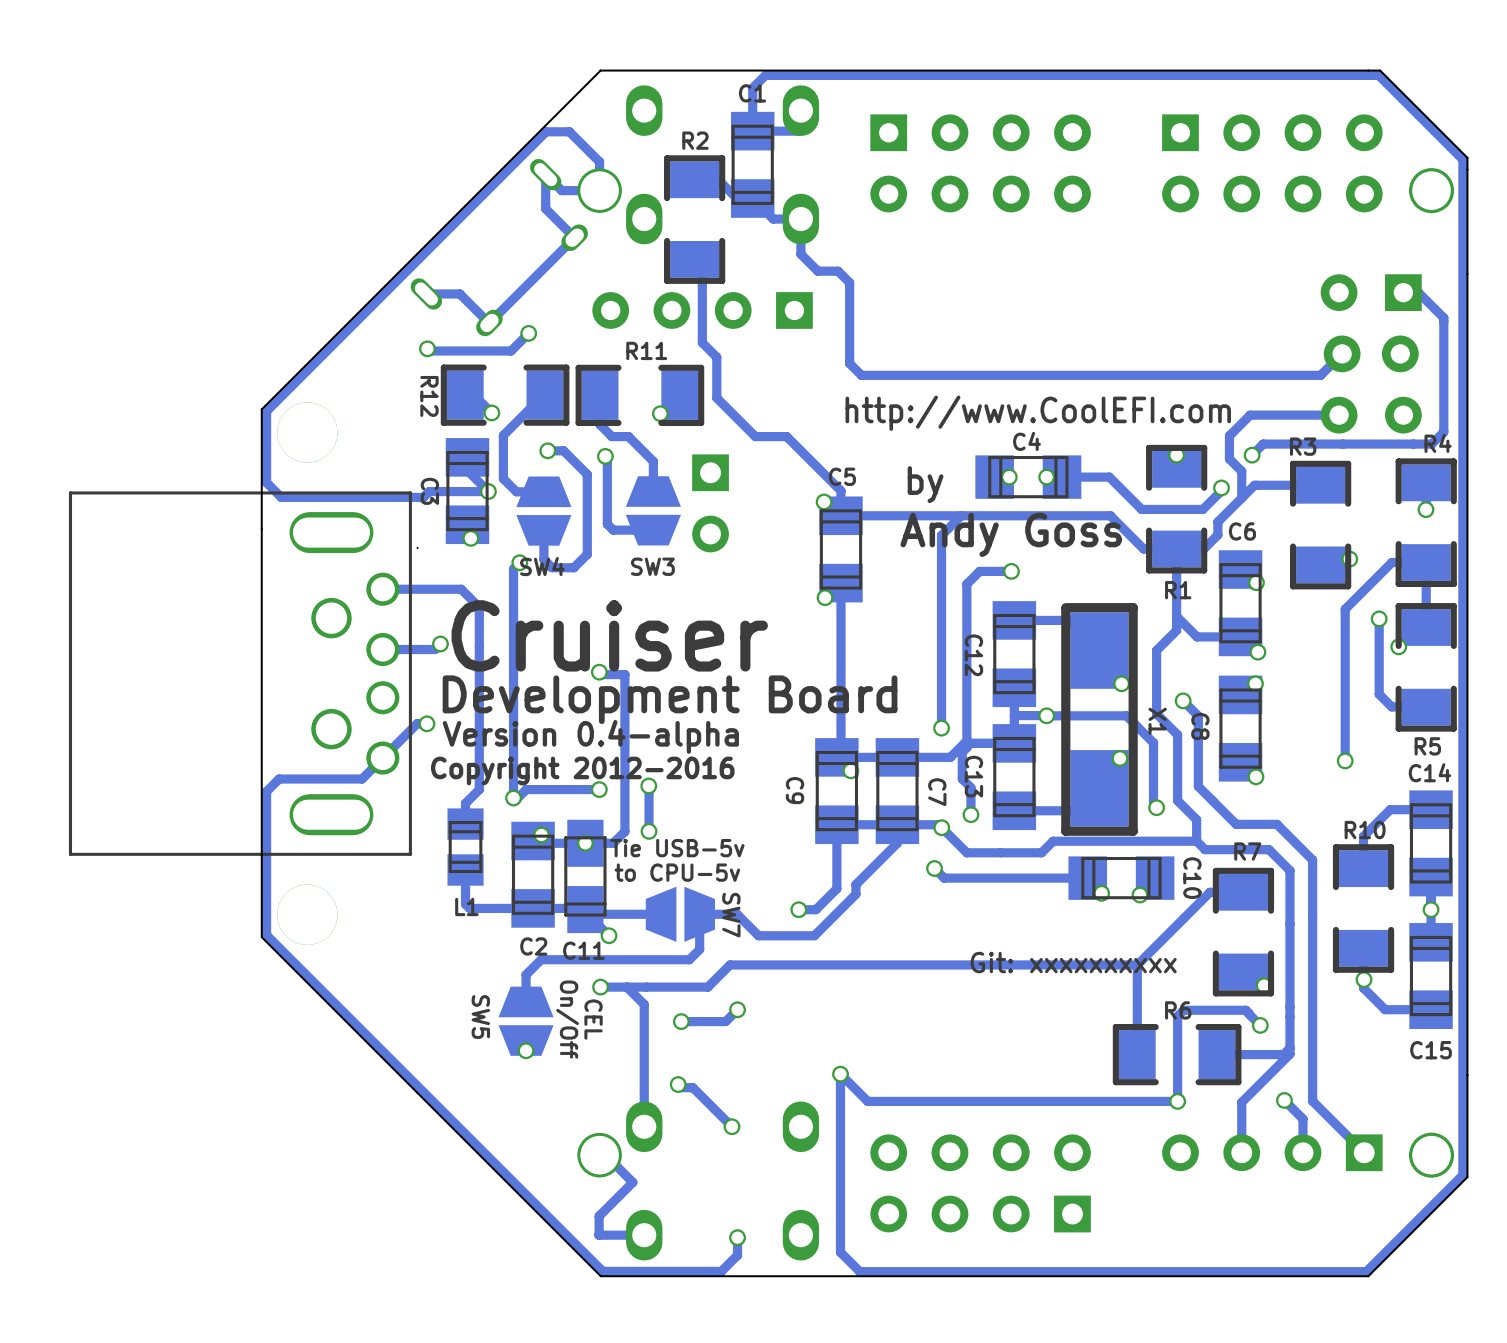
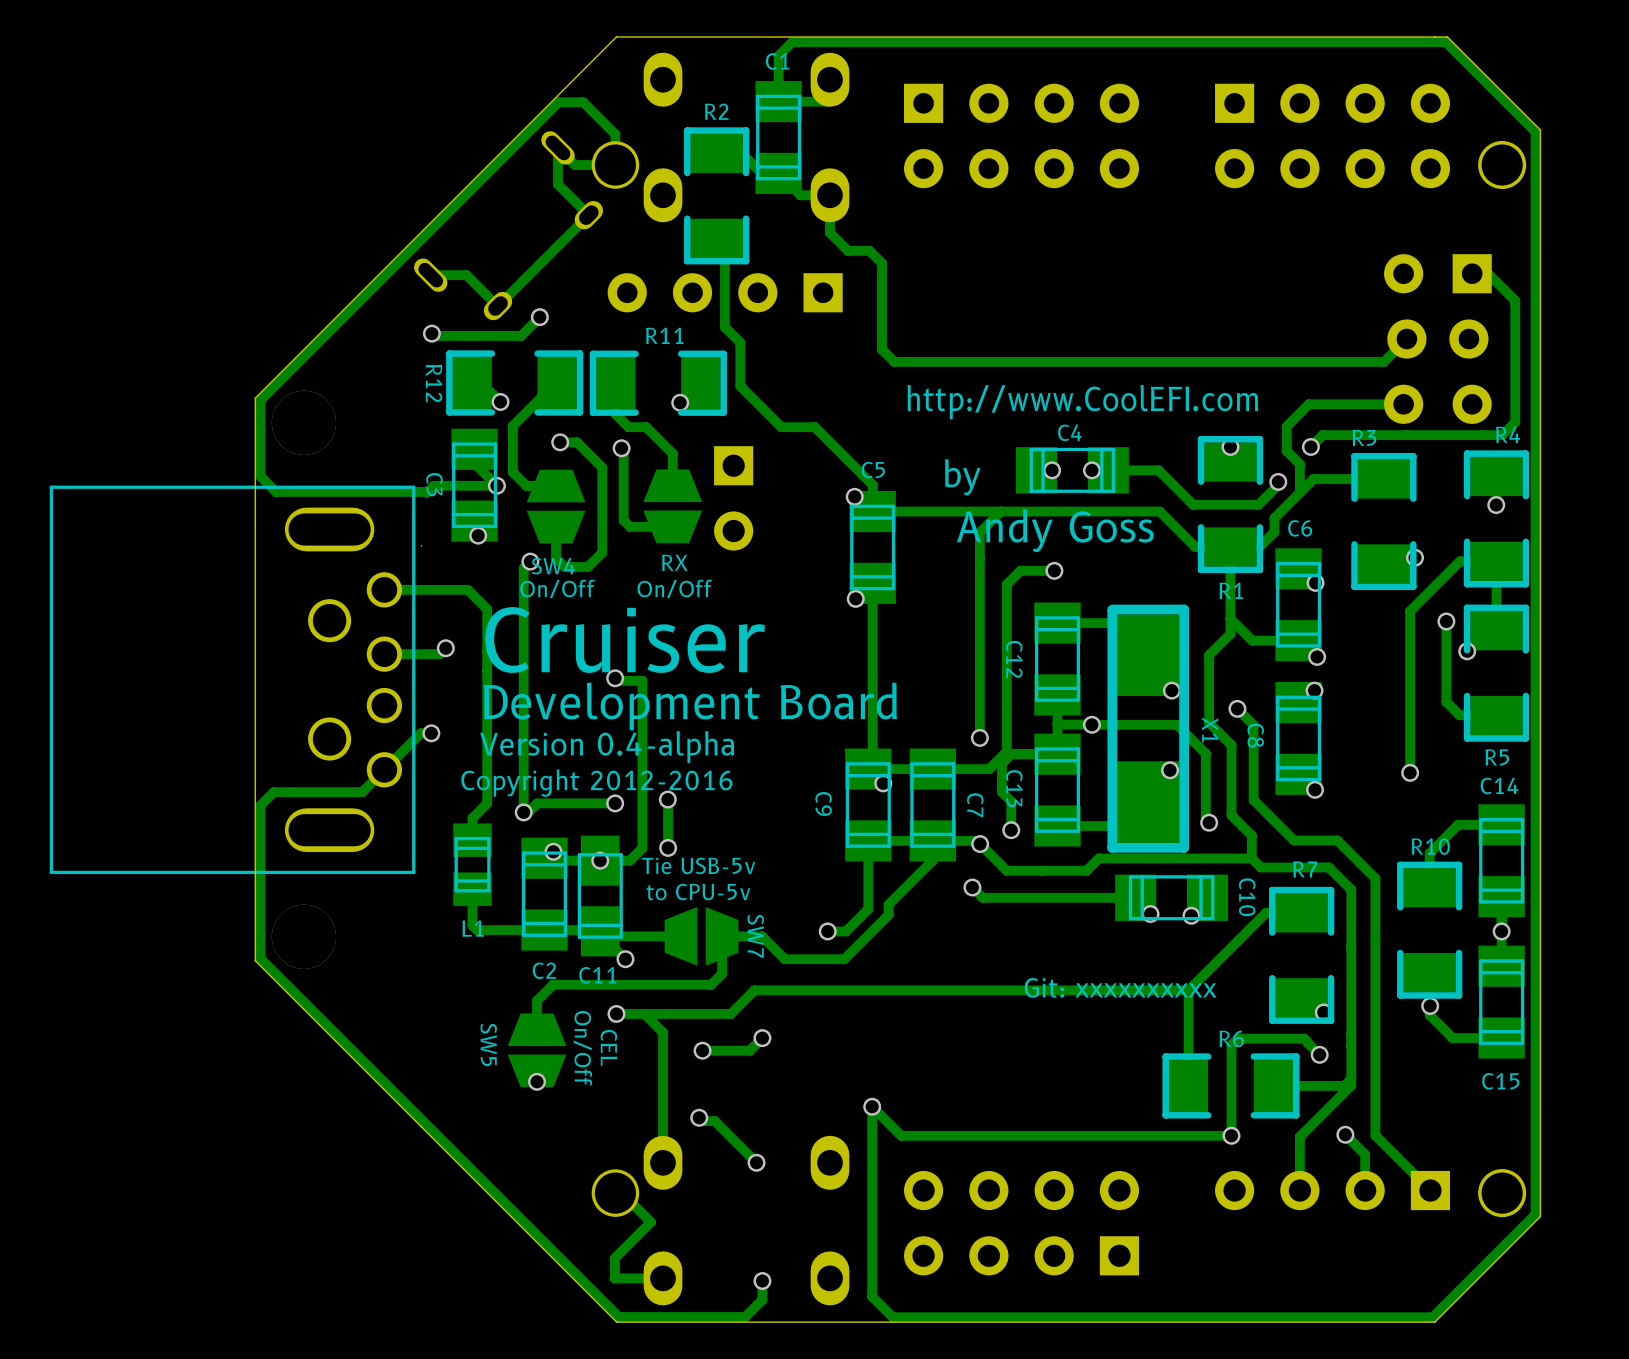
text: none -> RX (674, 562)
SW3 name: SW3 (652, 566) -> none
text: none -> On/Off (557, 588)
text: none -> On/Off (674, 588)

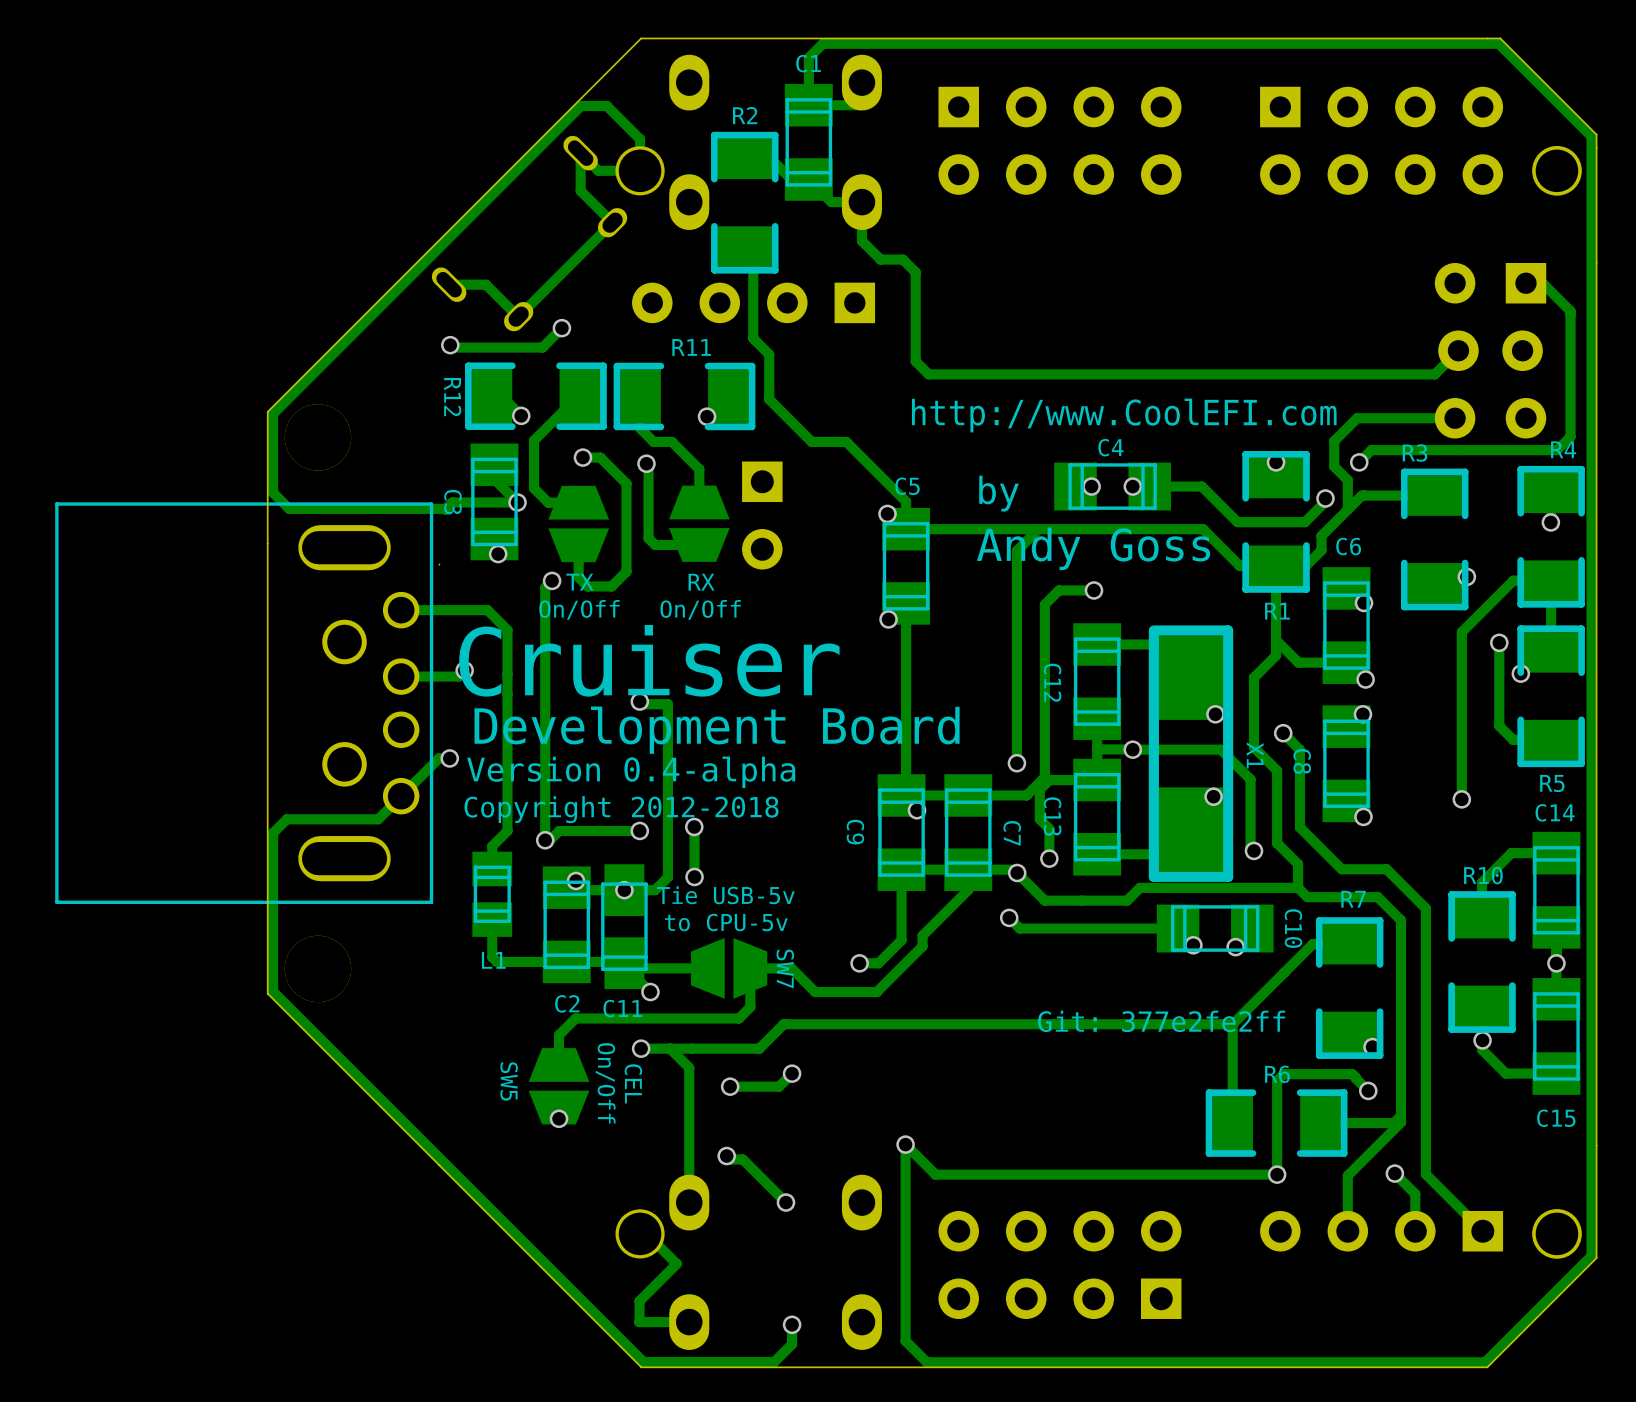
text: none -> TX (579, 582)
SW4 name: SW4 (553, 566) -> none
text: Copyright 2012-2016 (596, 783) -> Copyright 2012-2018 (621, 809)
text: Git: xxxxxxxxxx (1120, 987) -> Git: 377e2fe2ff (1161, 1021)

